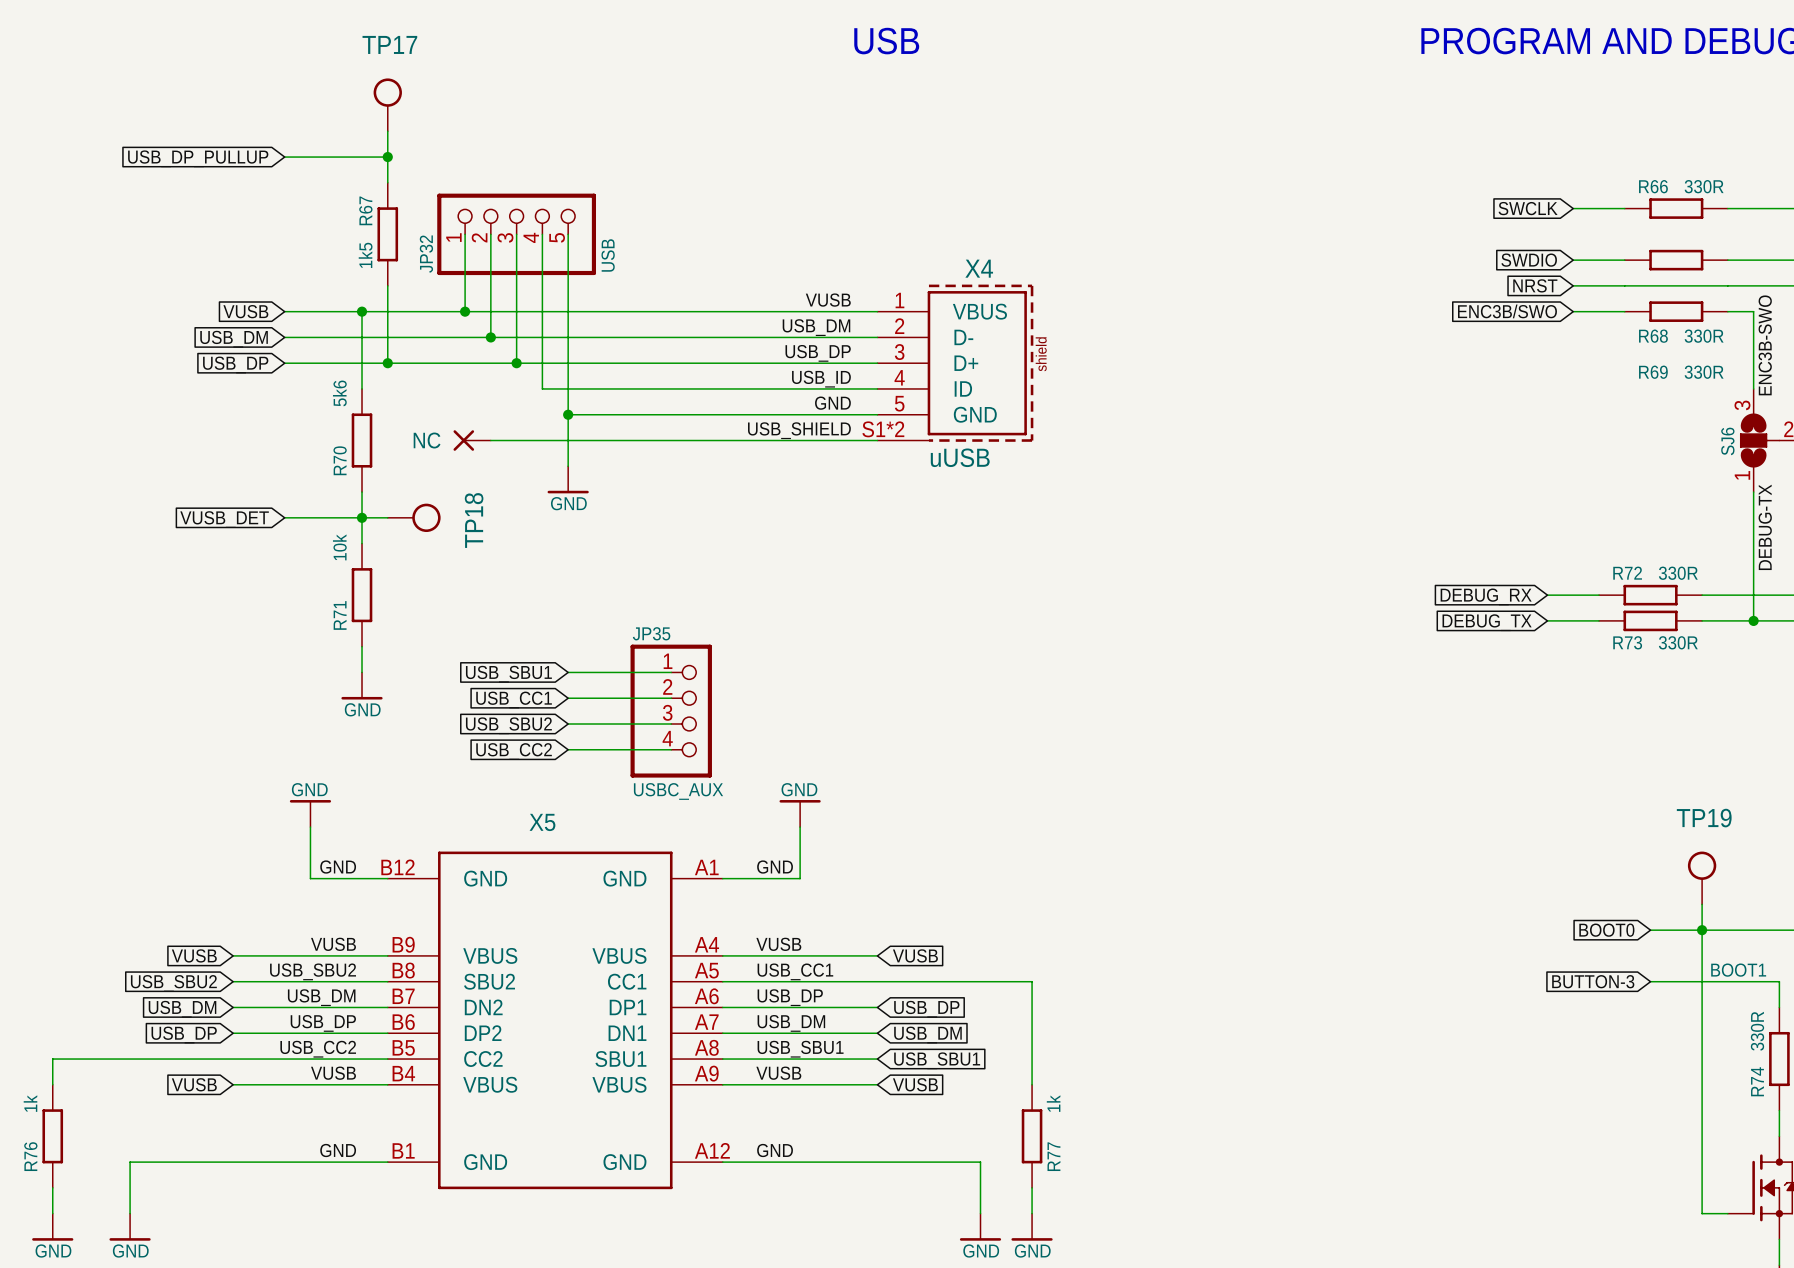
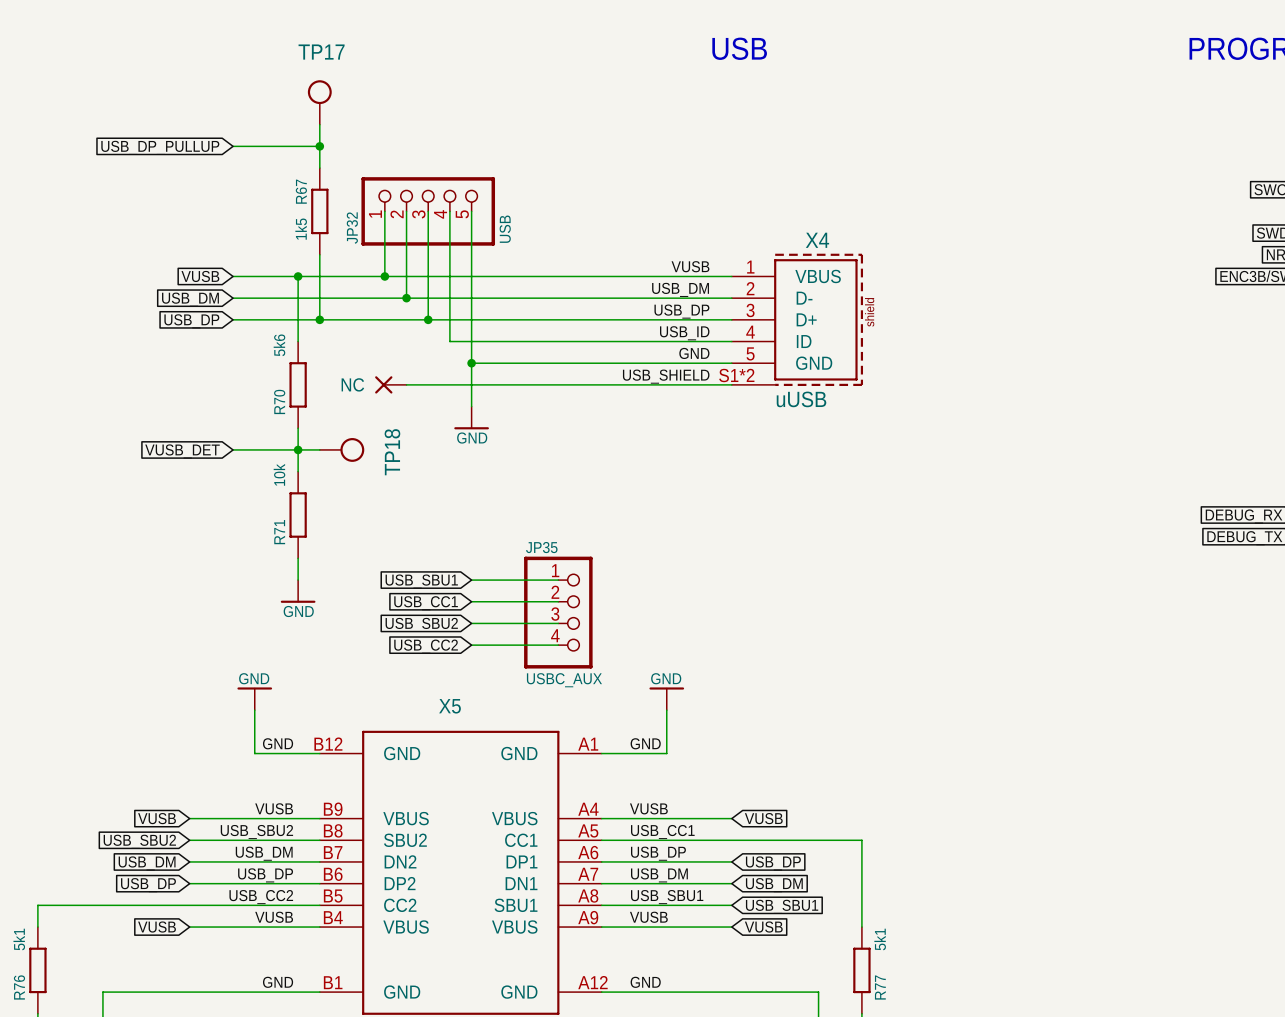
R76 value: 1k (30, 1103) -> 5k1 (19, 939)
R77 value: 1k (1053, 1103) -> 5k1 (880, 939)

